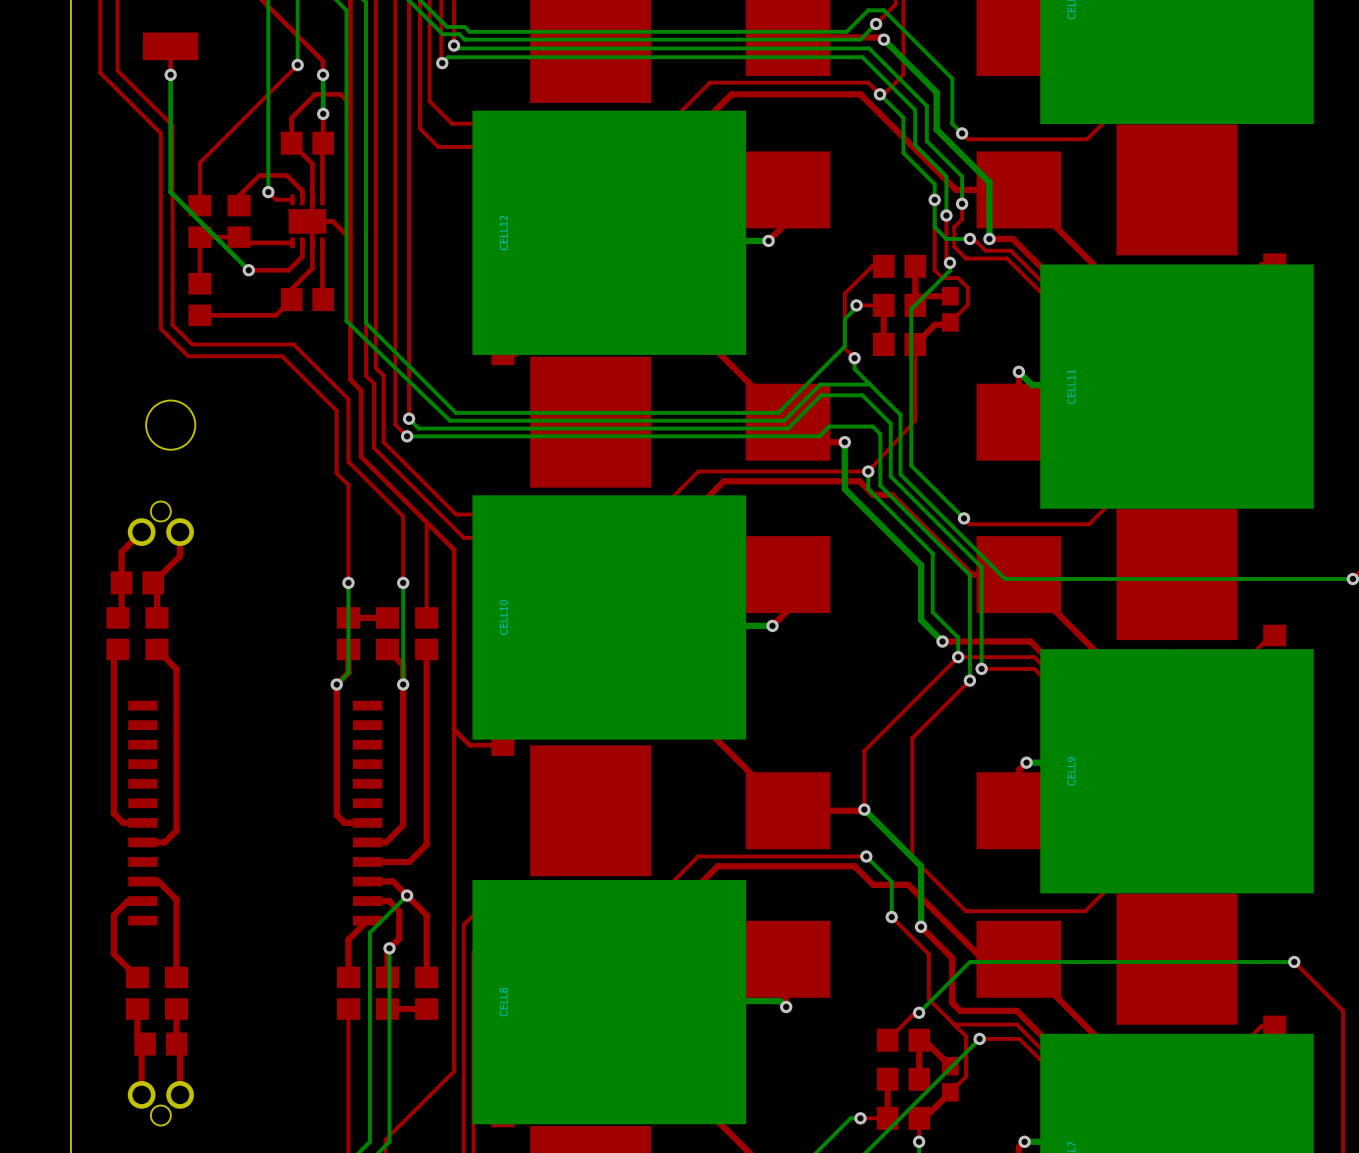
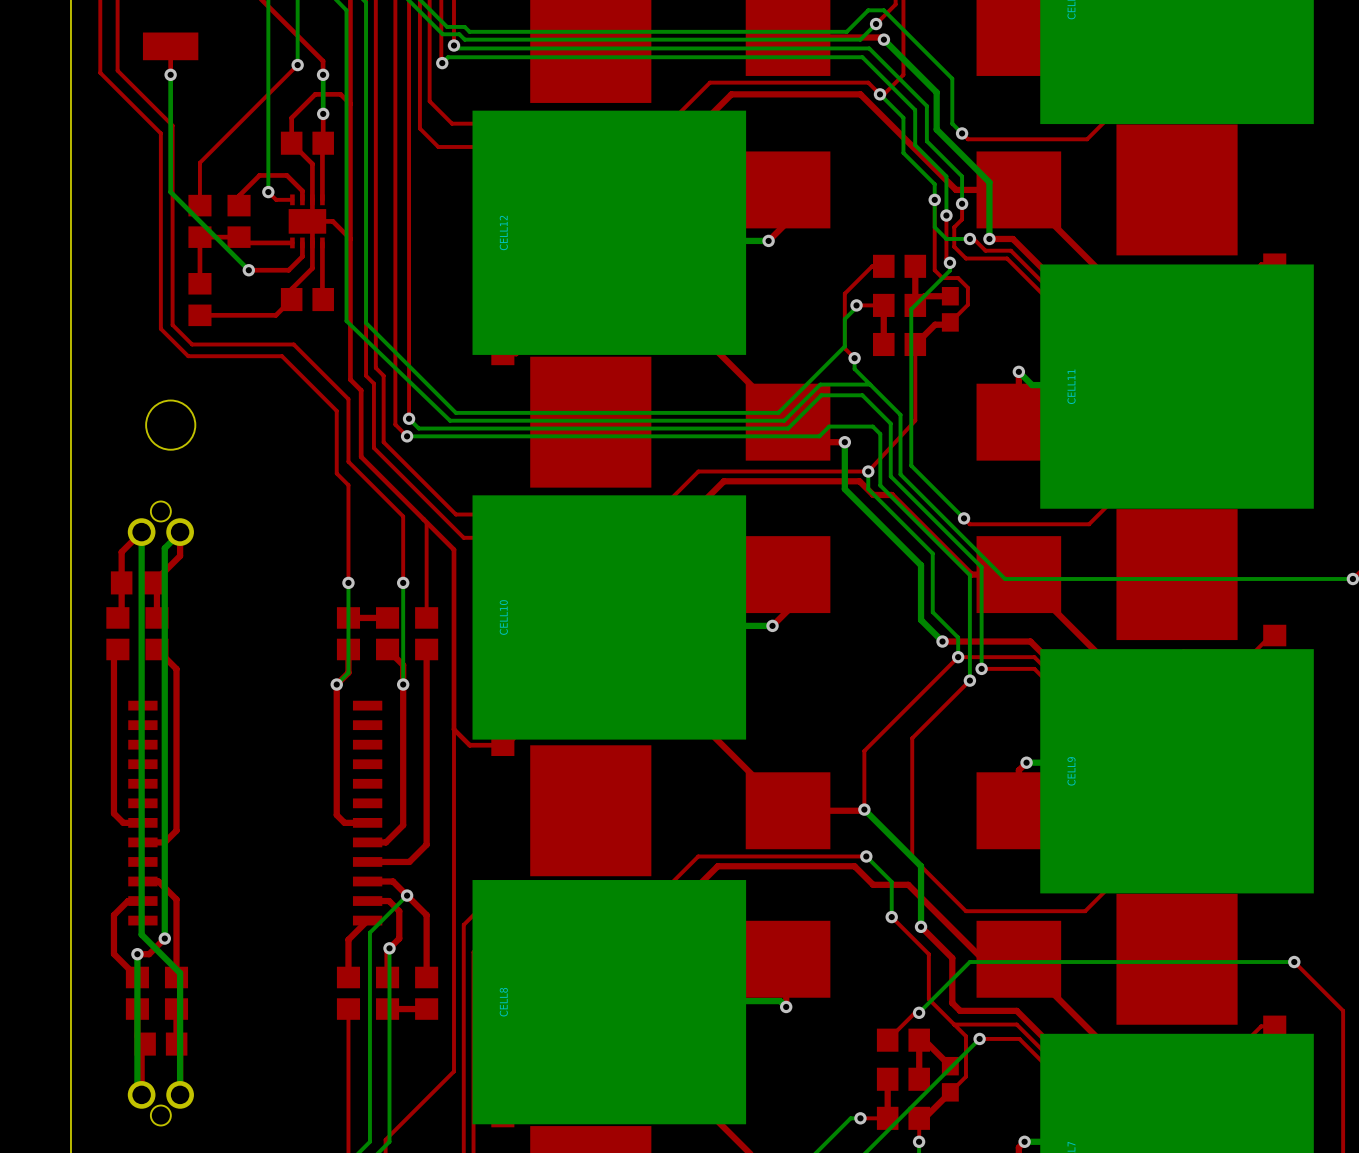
bottom track: none -> (141, 532) (141, 934) (180, 973) (180, 1094)
bottom track: none -> (180, 532) (164, 548) (164, 938)
top track: none -> (164, 938) (149, 954) (137, 954)
via: none -> (164, 938)
bottom track: none -> (137, 954) (137, 1090) (141, 1094)
via: none -> (137, 954)

